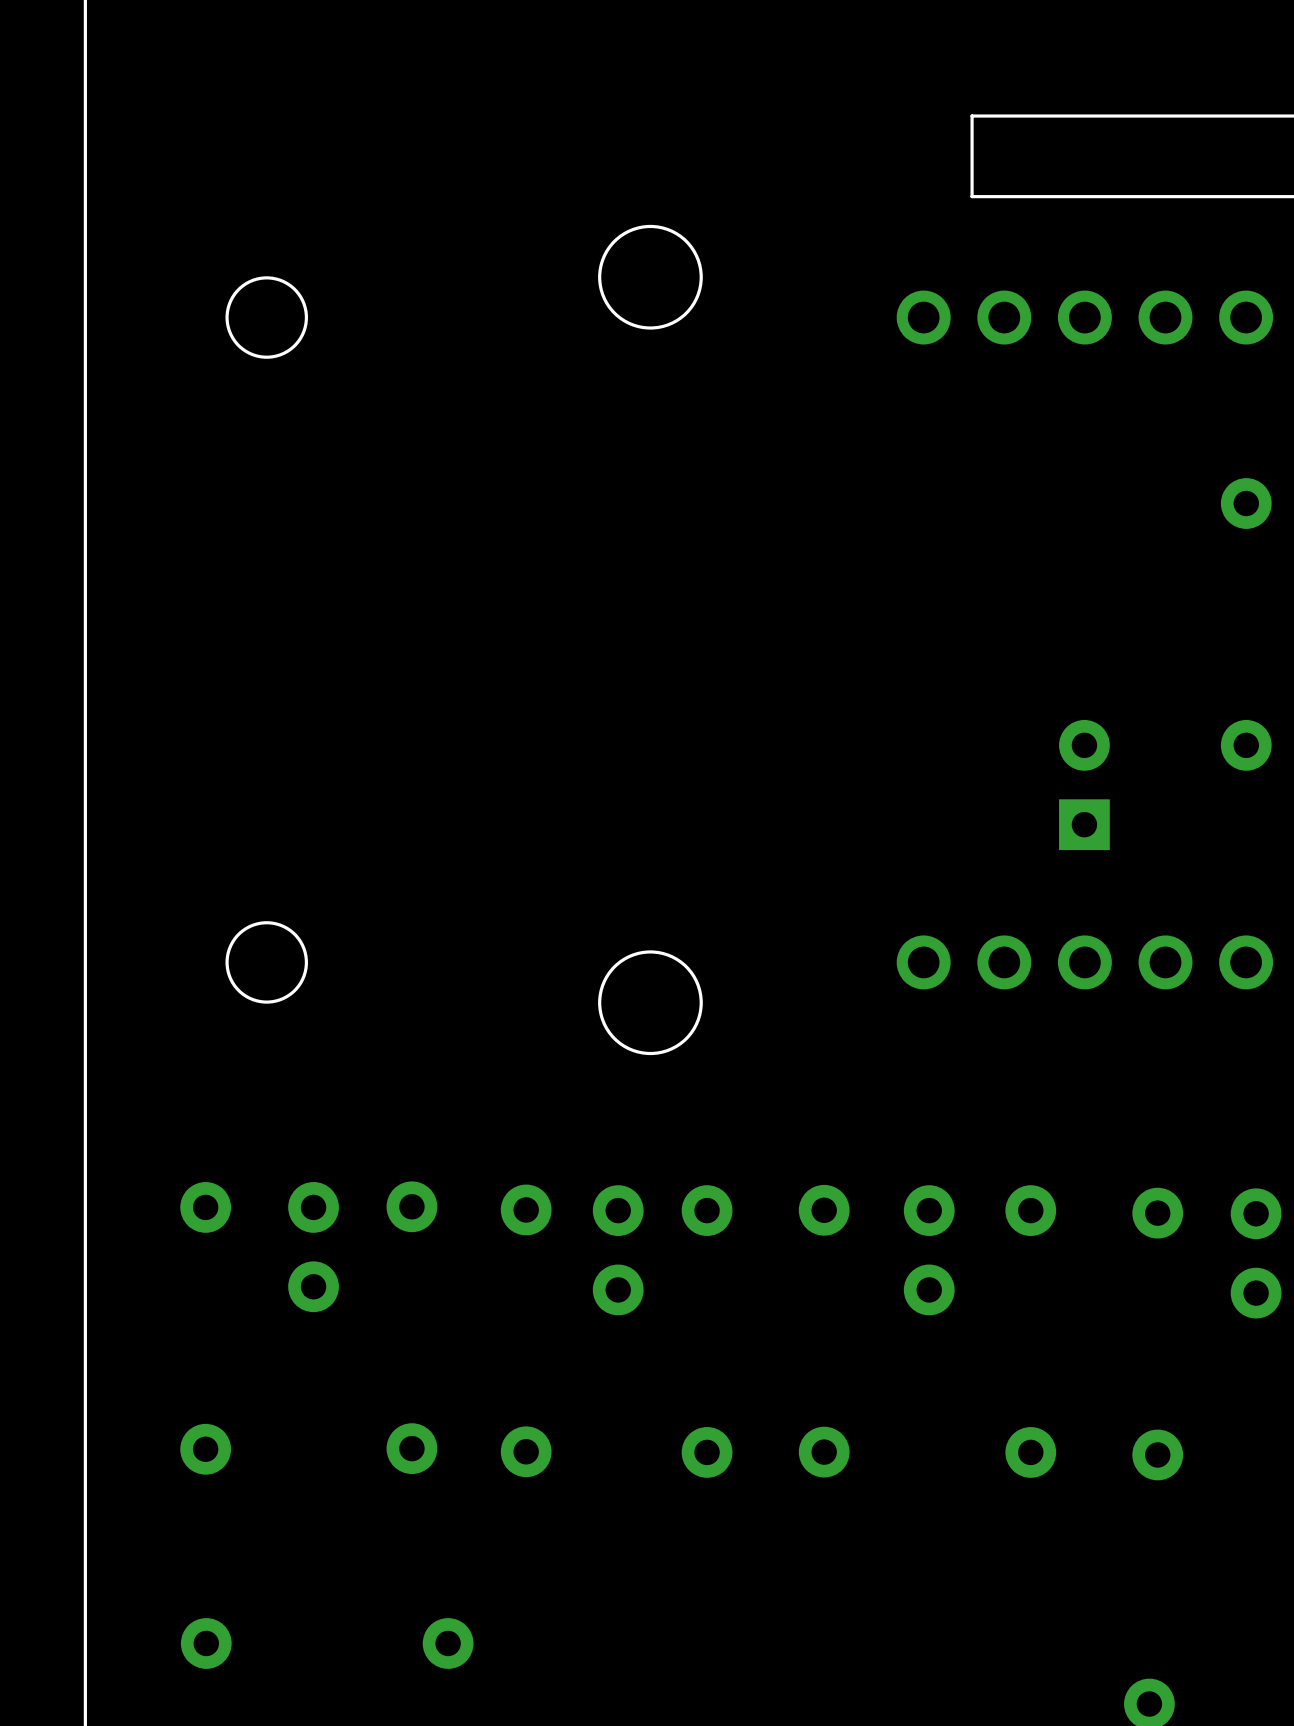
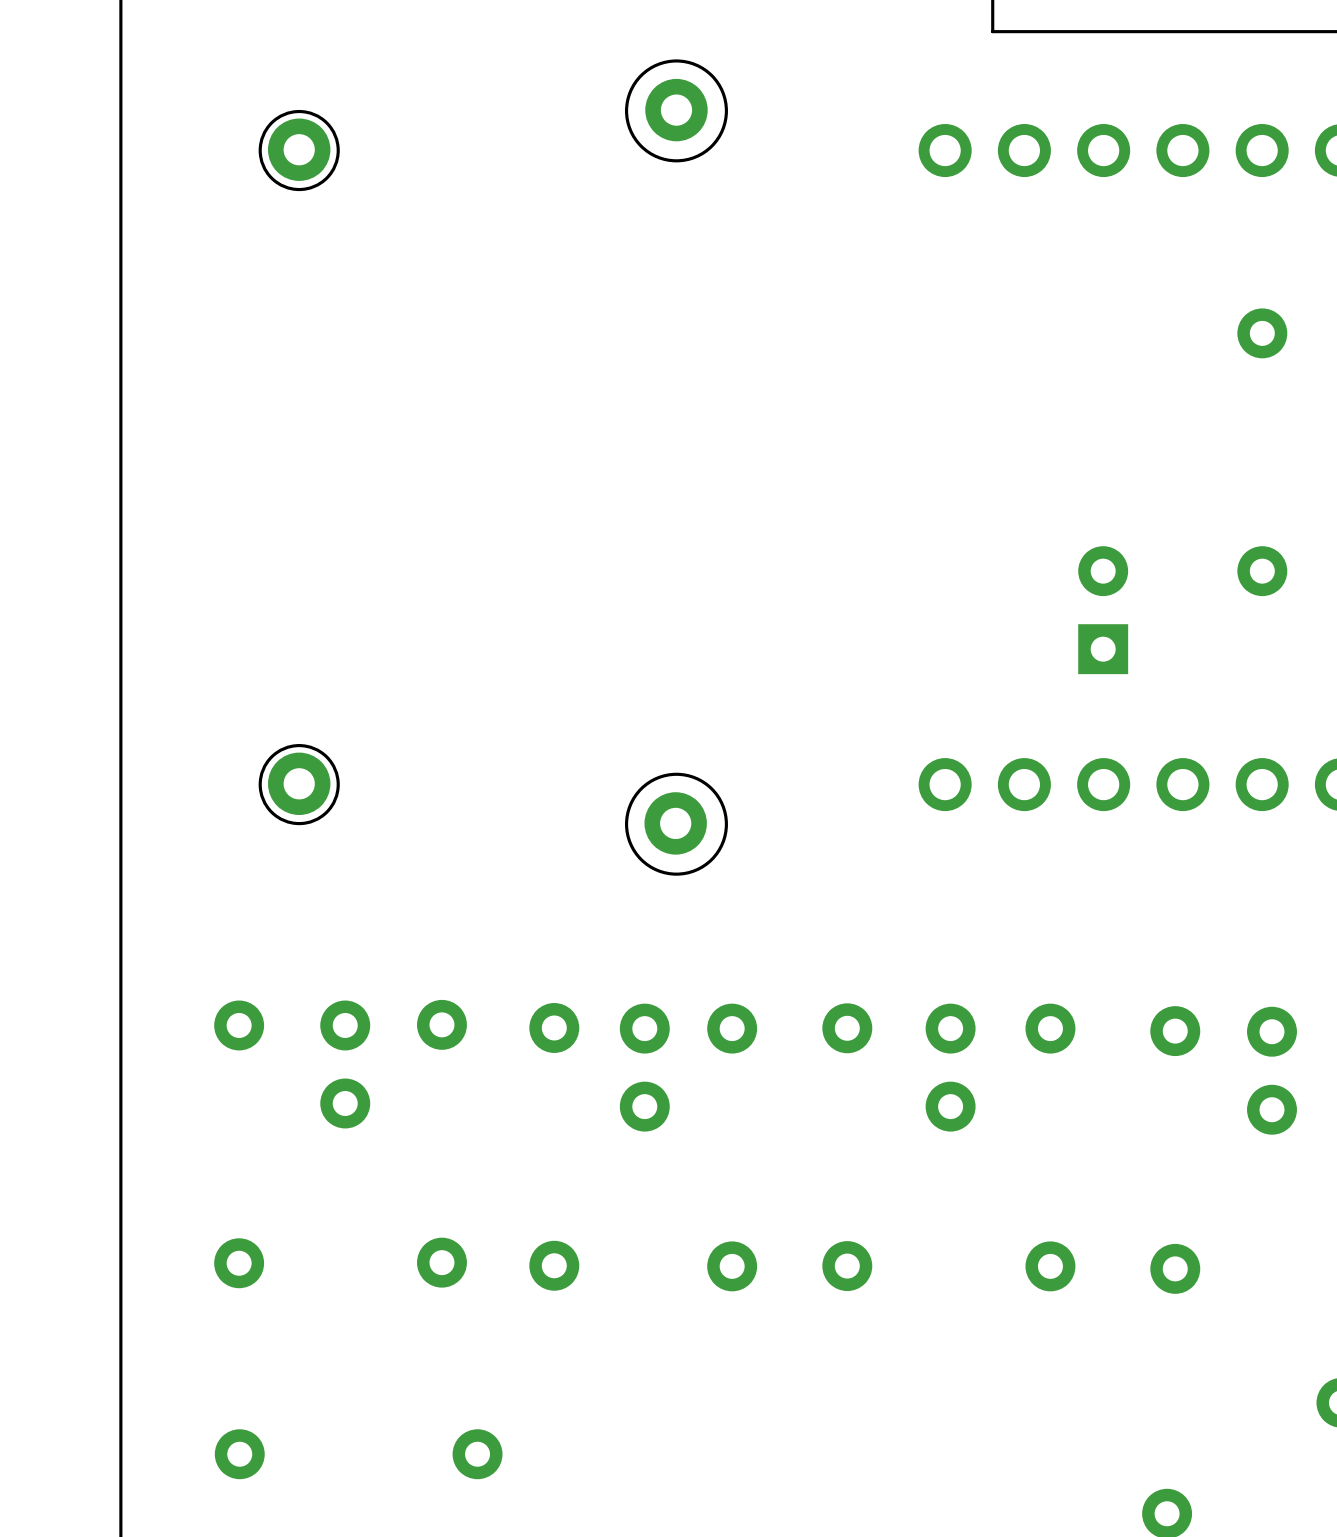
part: none -> (676, 110)
part: none -> (299, 149)
part: none -> (299, 783)
part: none -> (675, 823)

